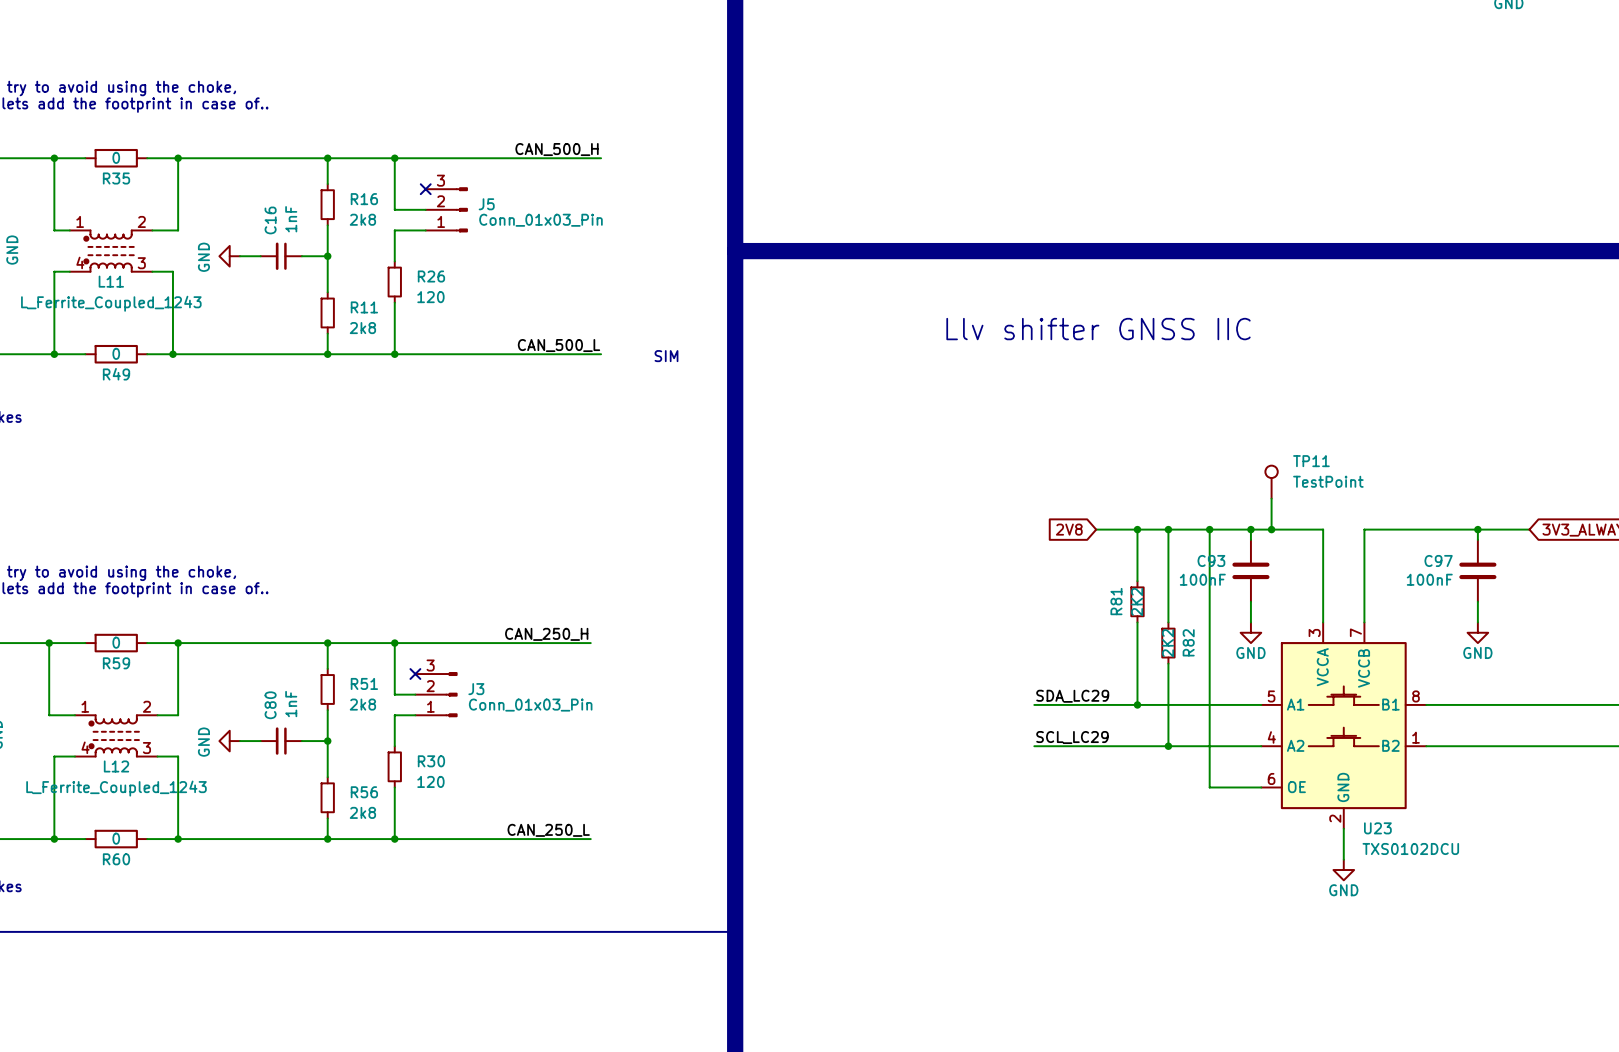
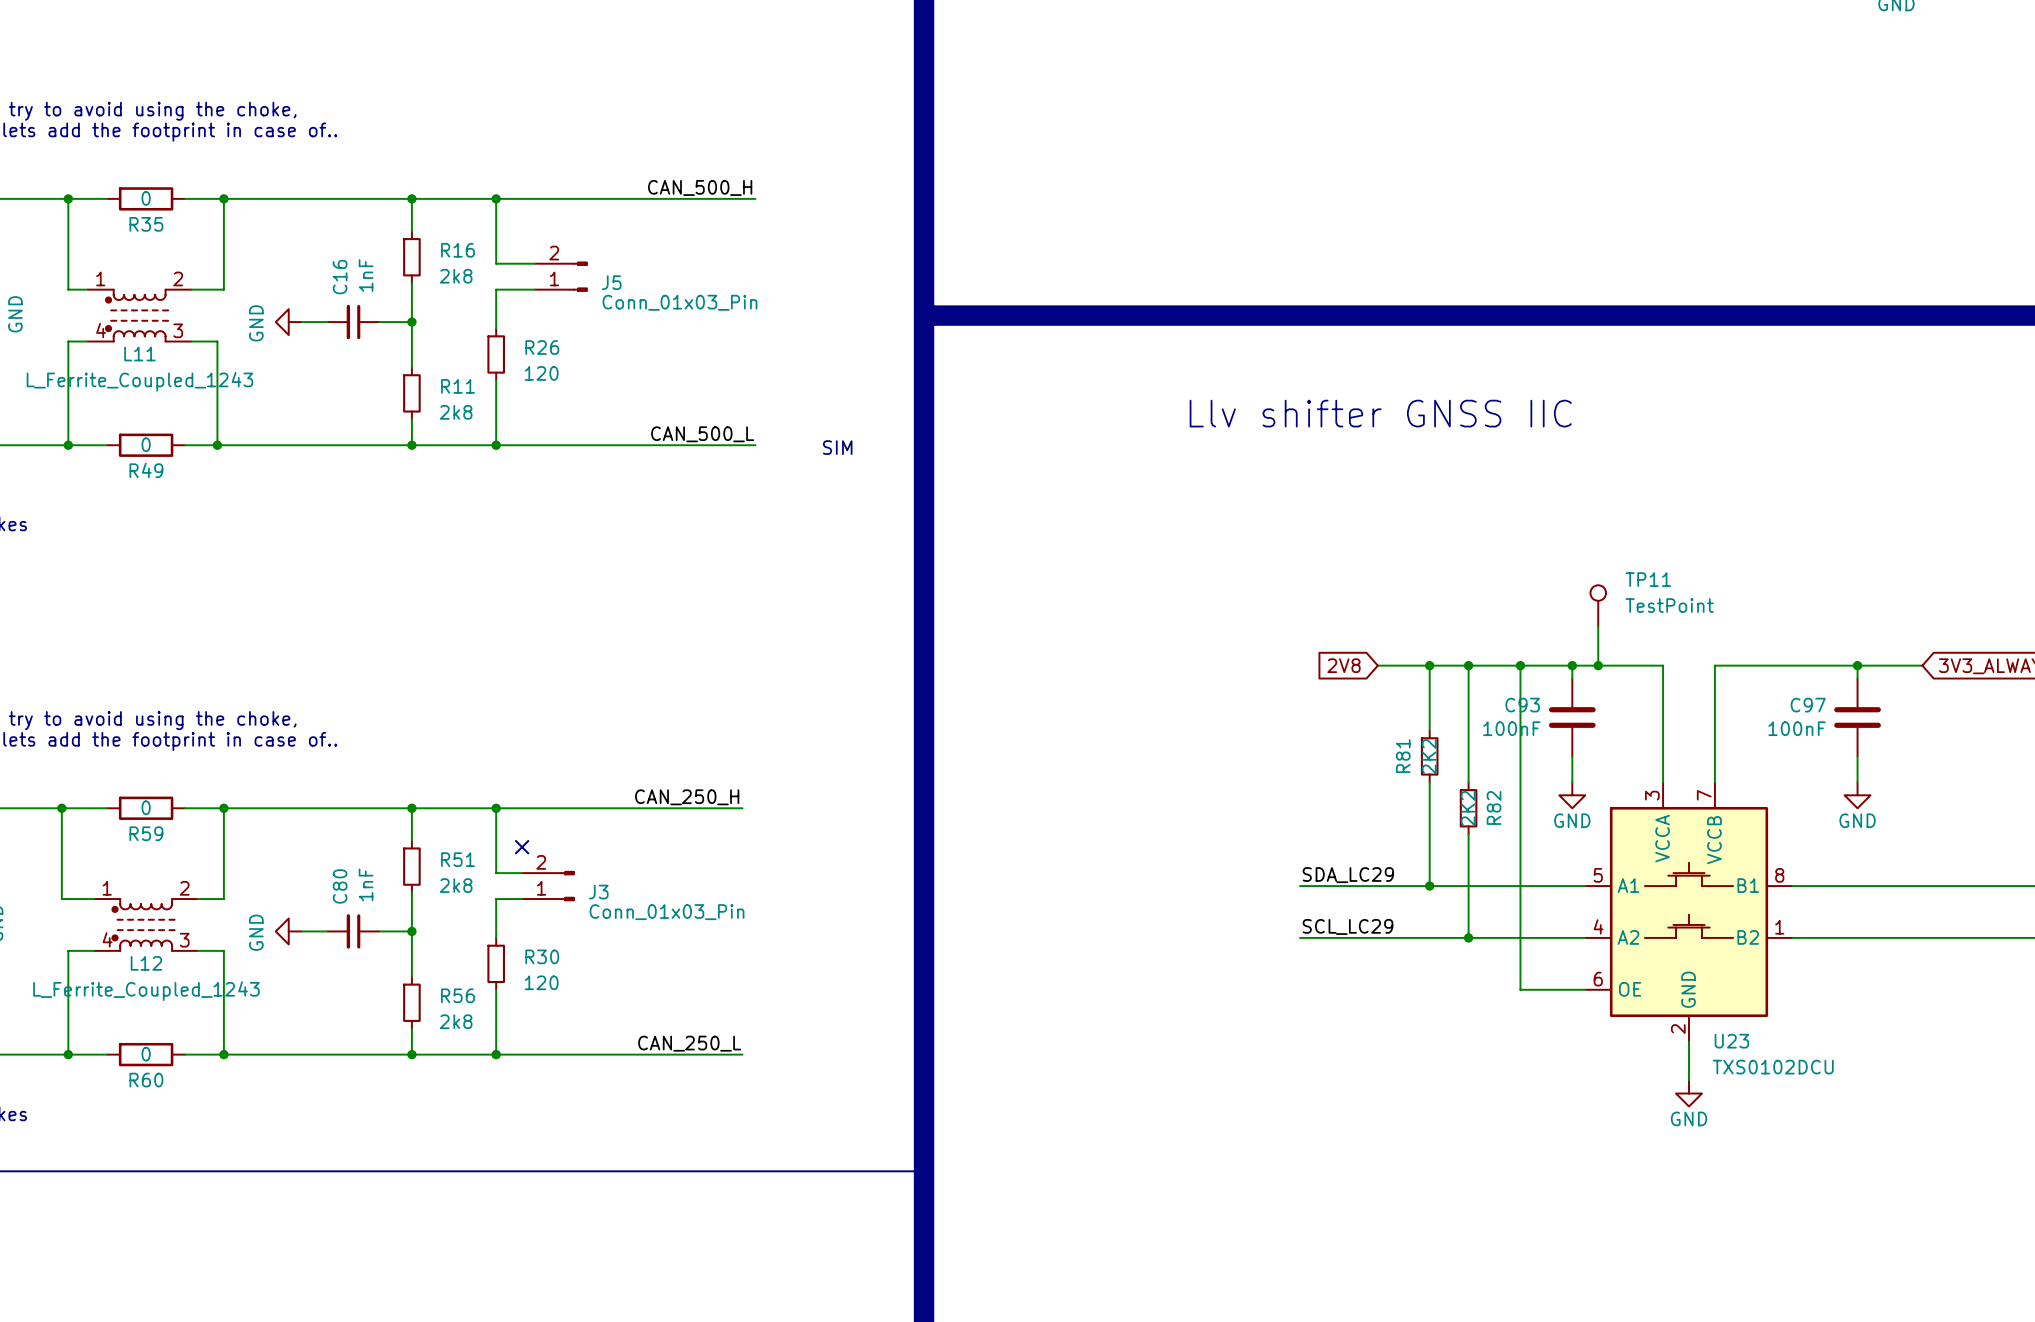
J5 symbol: [425, 187, 468, 233] -> [535, 261, 588, 292]
no-connect mark: (425, 189) -> none
J3 symbol: [415, 672, 458, 717] -> [522, 871, 575, 902]

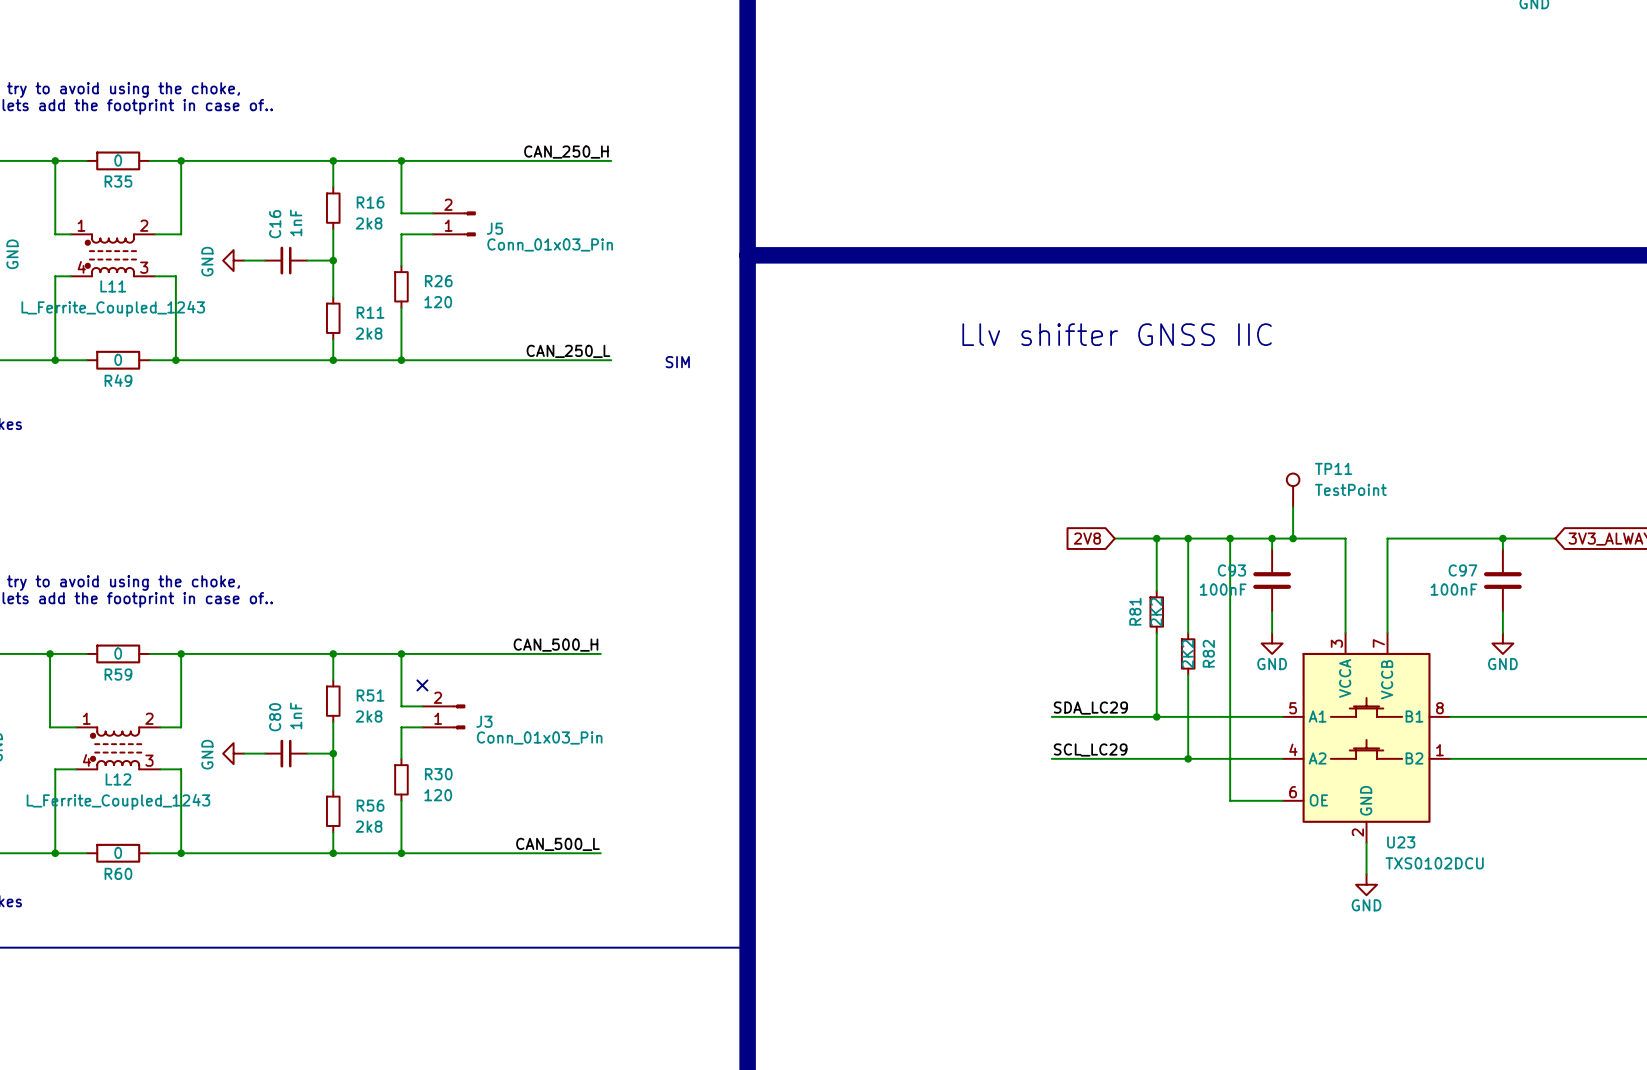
label: CAN_500_H (700, 187) -> CAN_250_H (566, 152)
label: CAN_500_L (702, 434) -> CAN_250_L (568, 351)
label: CAN_250_H (687, 797) -> CAN_500_H (555, 645)
label: CAN_250_L (689, 1043) -> CAN_500_L (557, 844)

